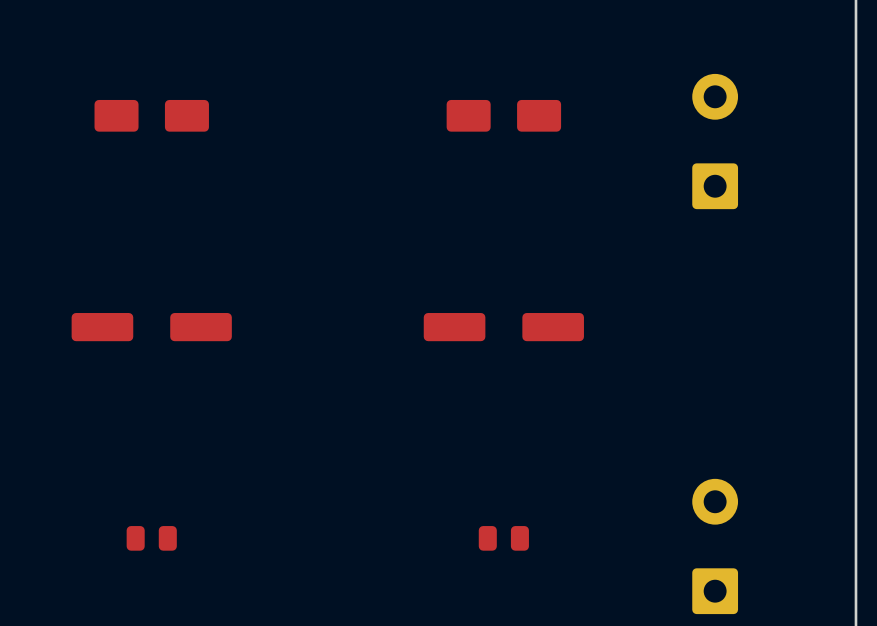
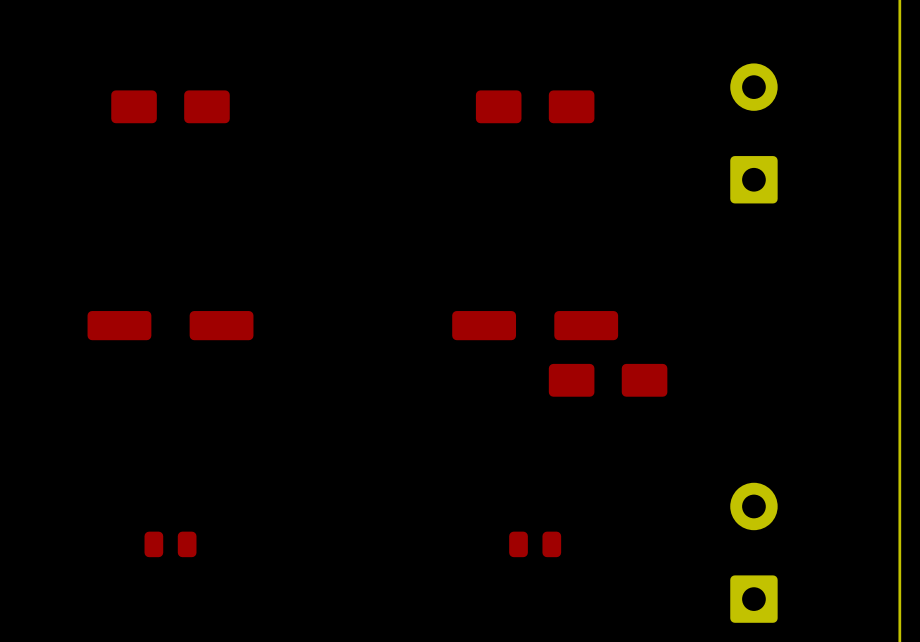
part: none -> (608, 380)

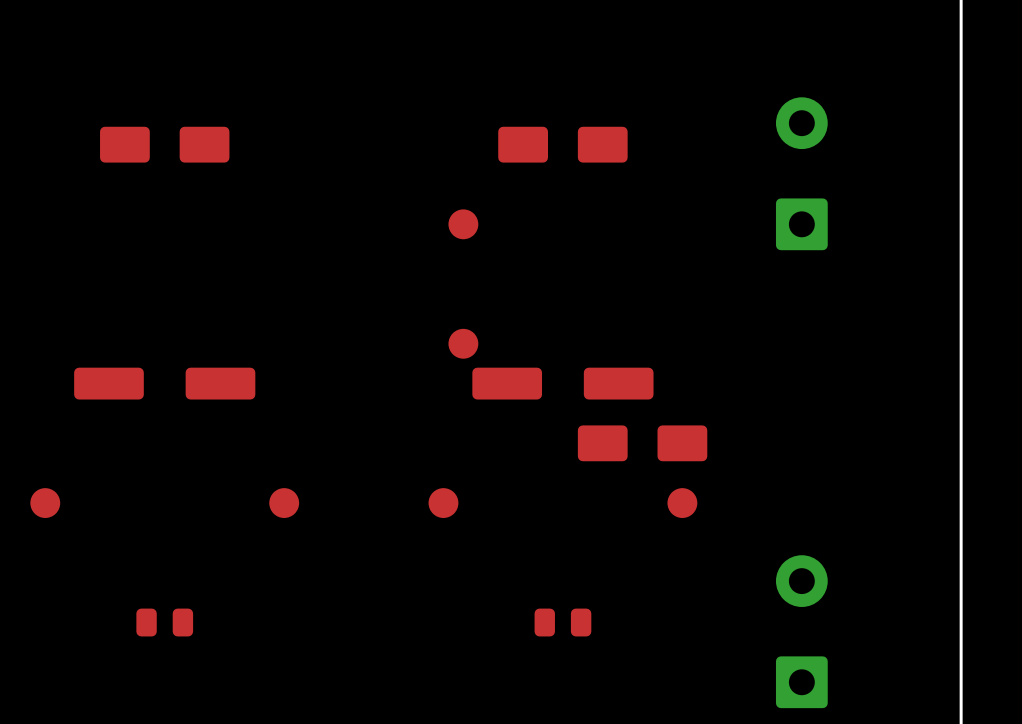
part: none -> (463, 224)
part: none -> (463, 343)
part: none -> (45, 503)
part: none -> (284, 503)
part: none -> (443, 503)
part: none -> (682, 503)

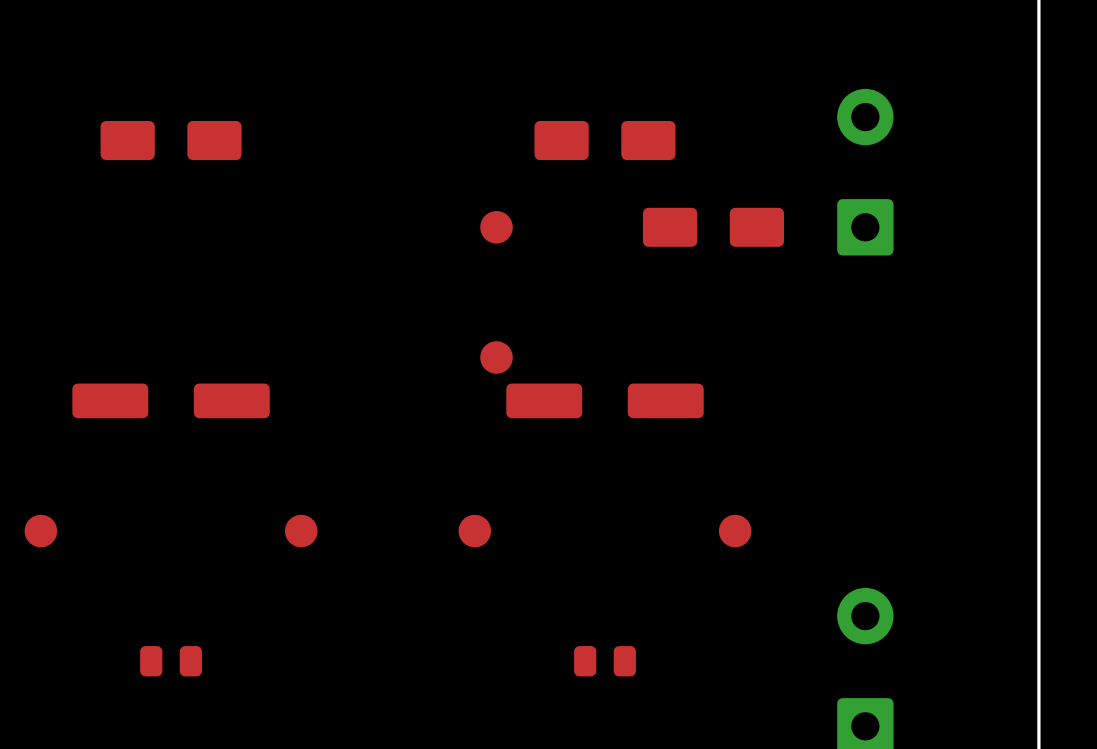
part position: (642, 443) -> (713, 227)

